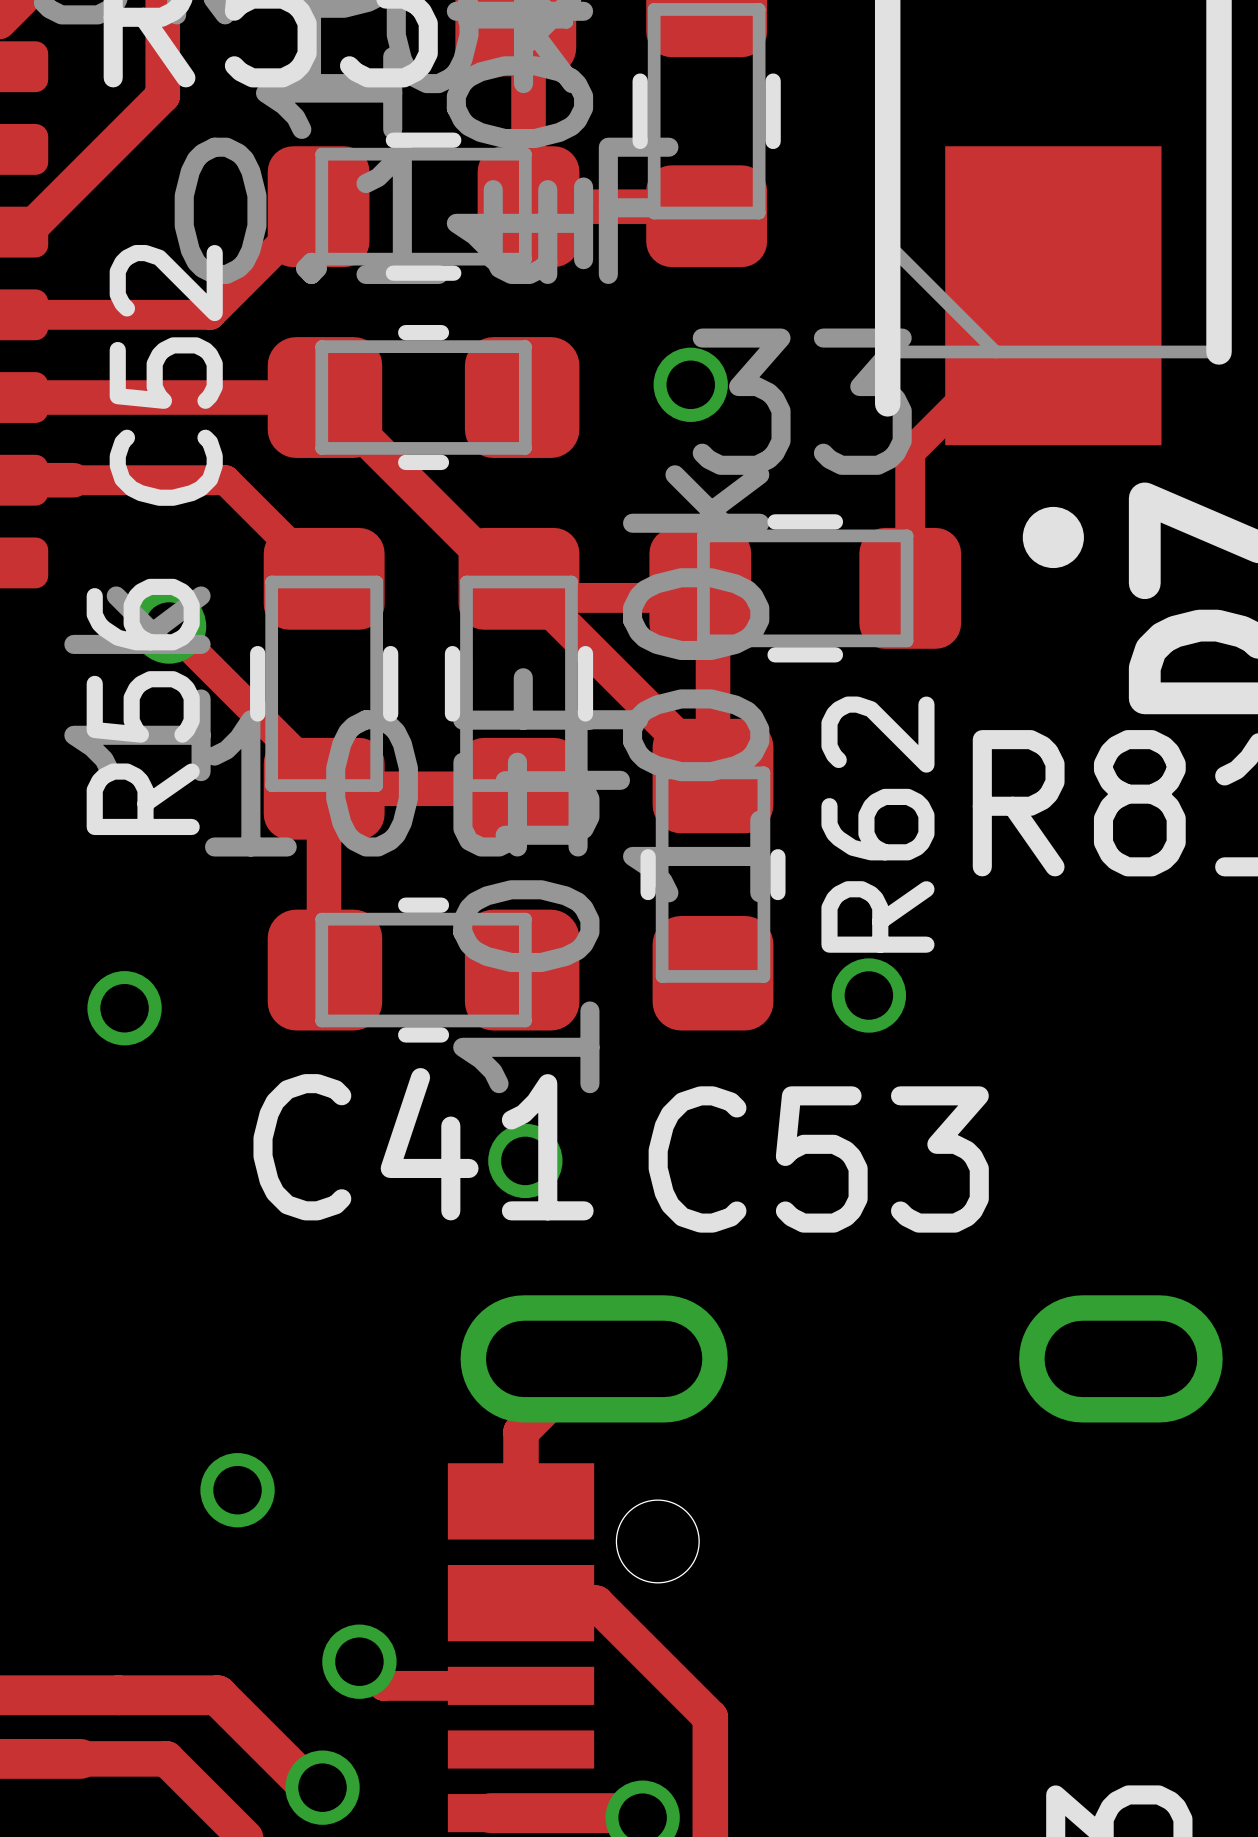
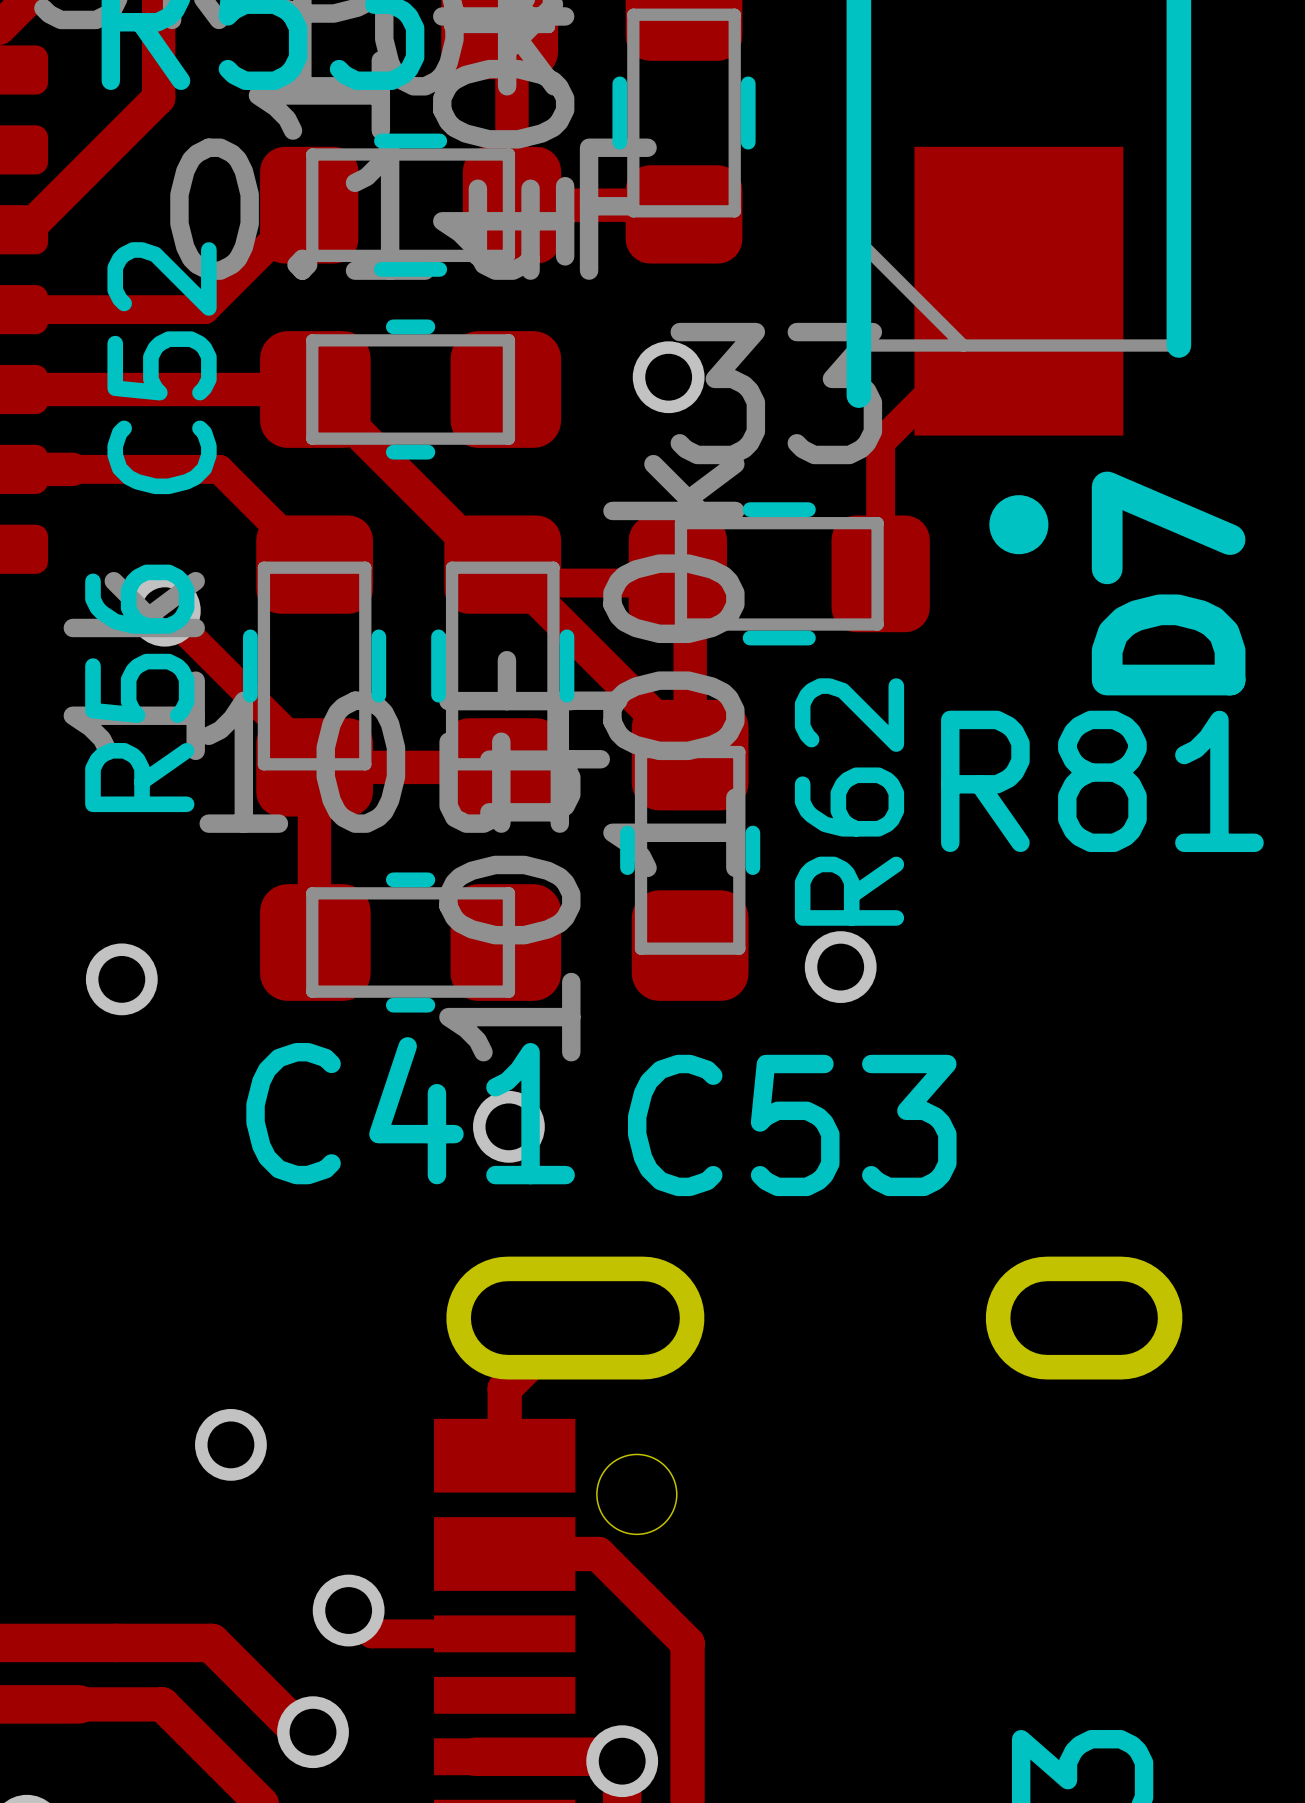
track: (596, 1603) (710, 1717) -> (577, 1554) (598, 1554) (687, 1643) (687, 1664)

